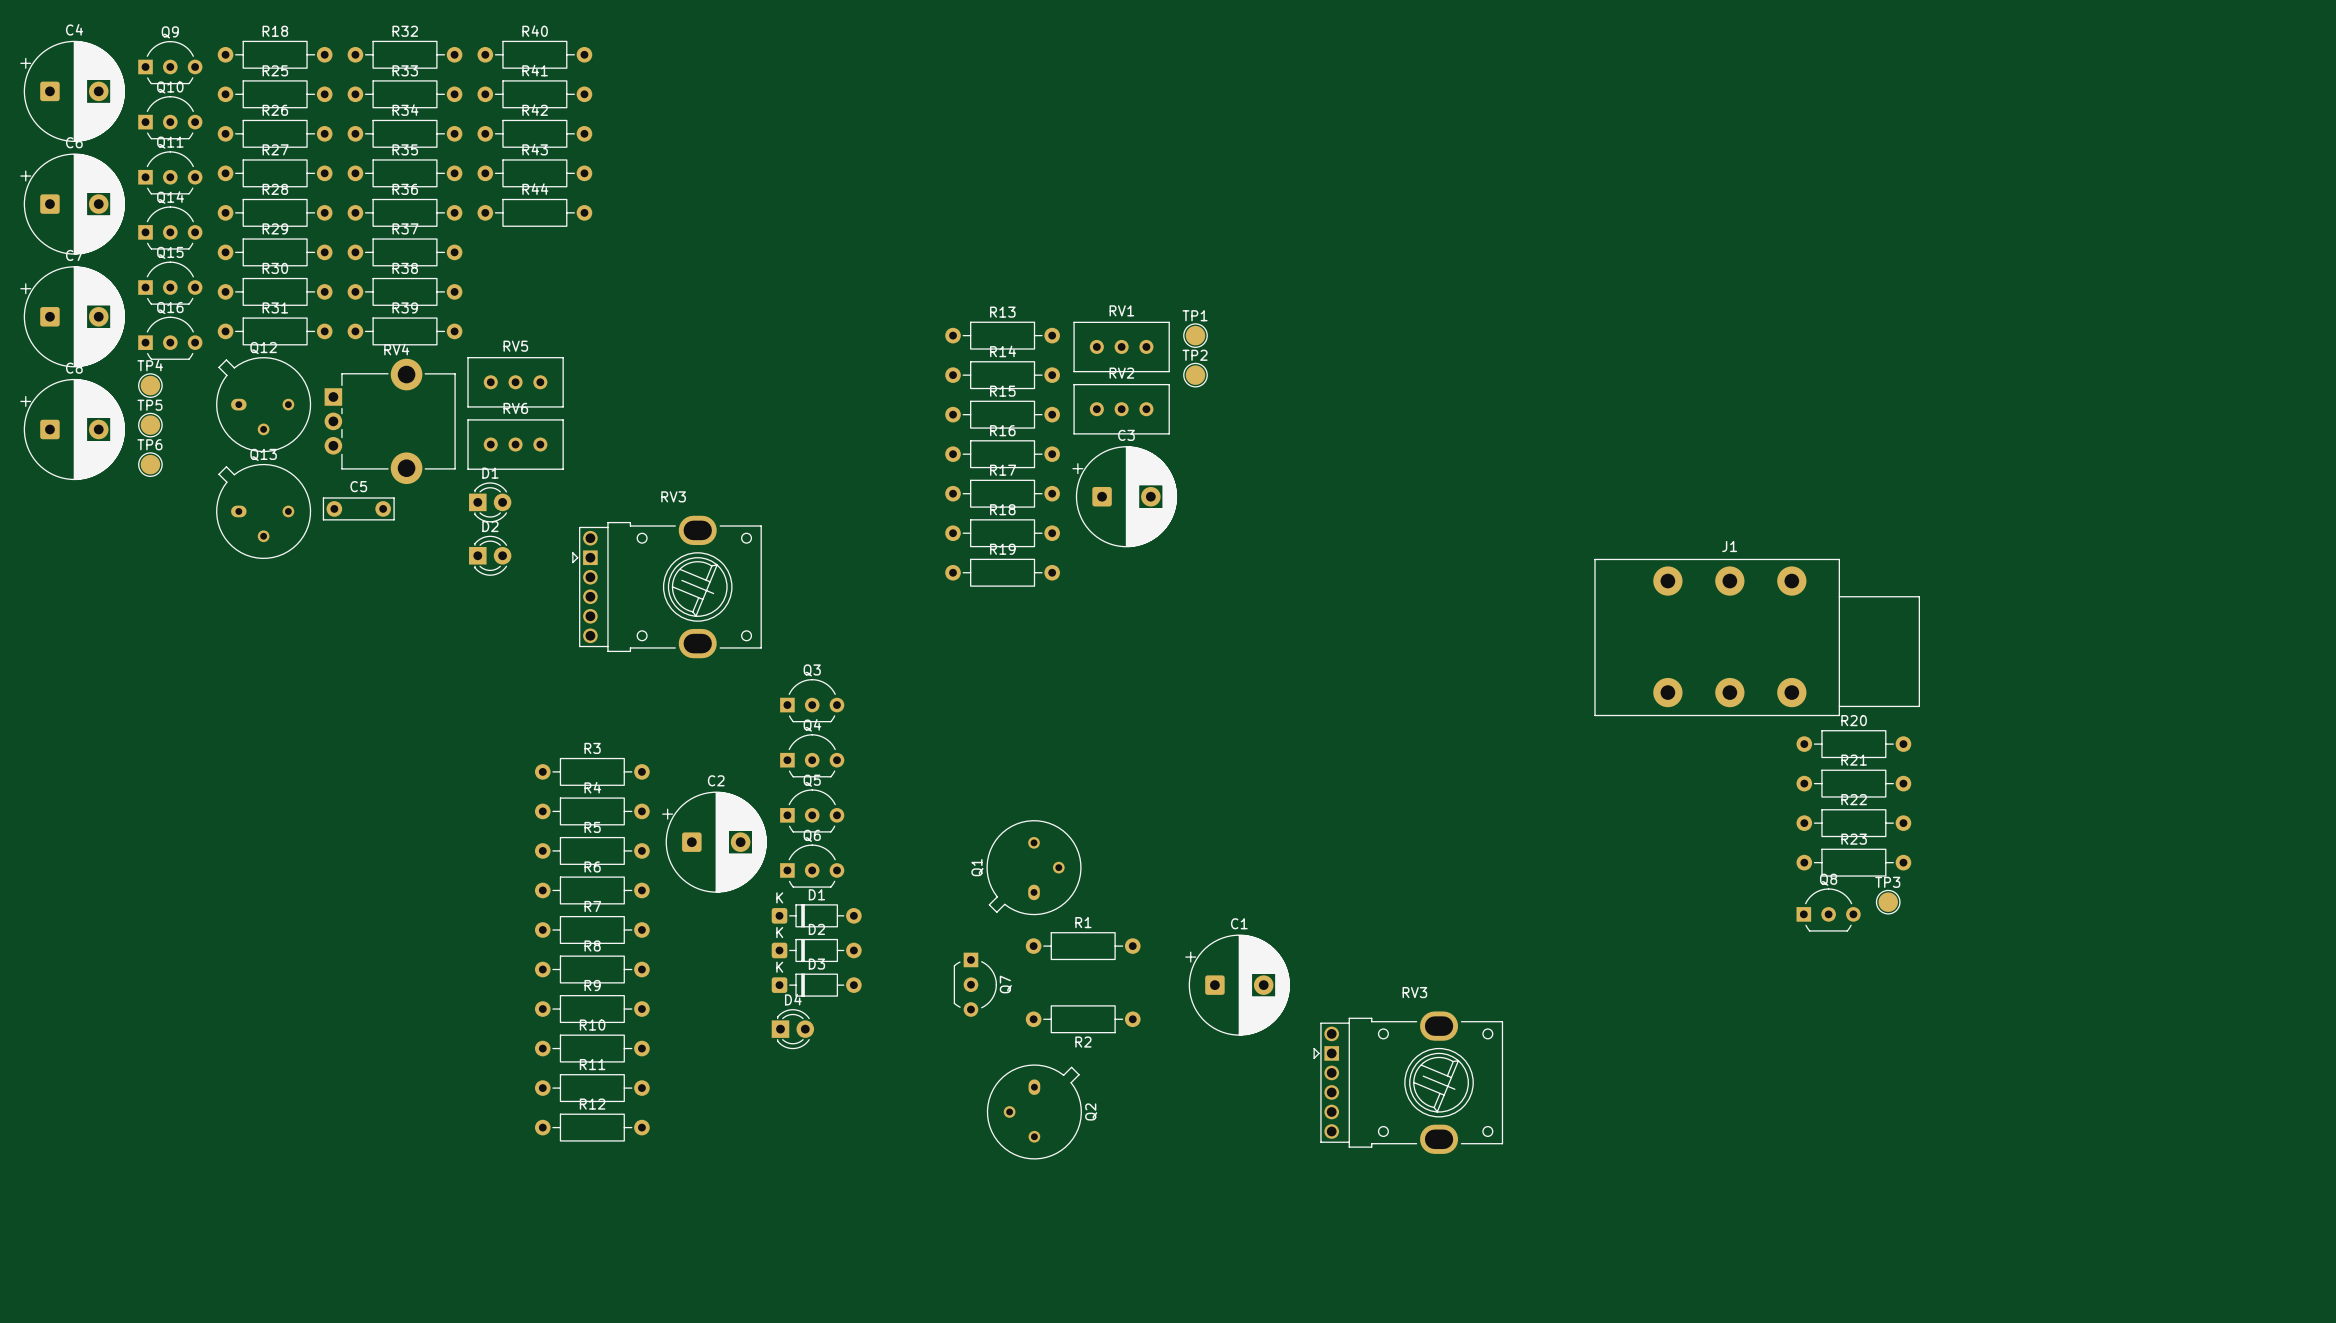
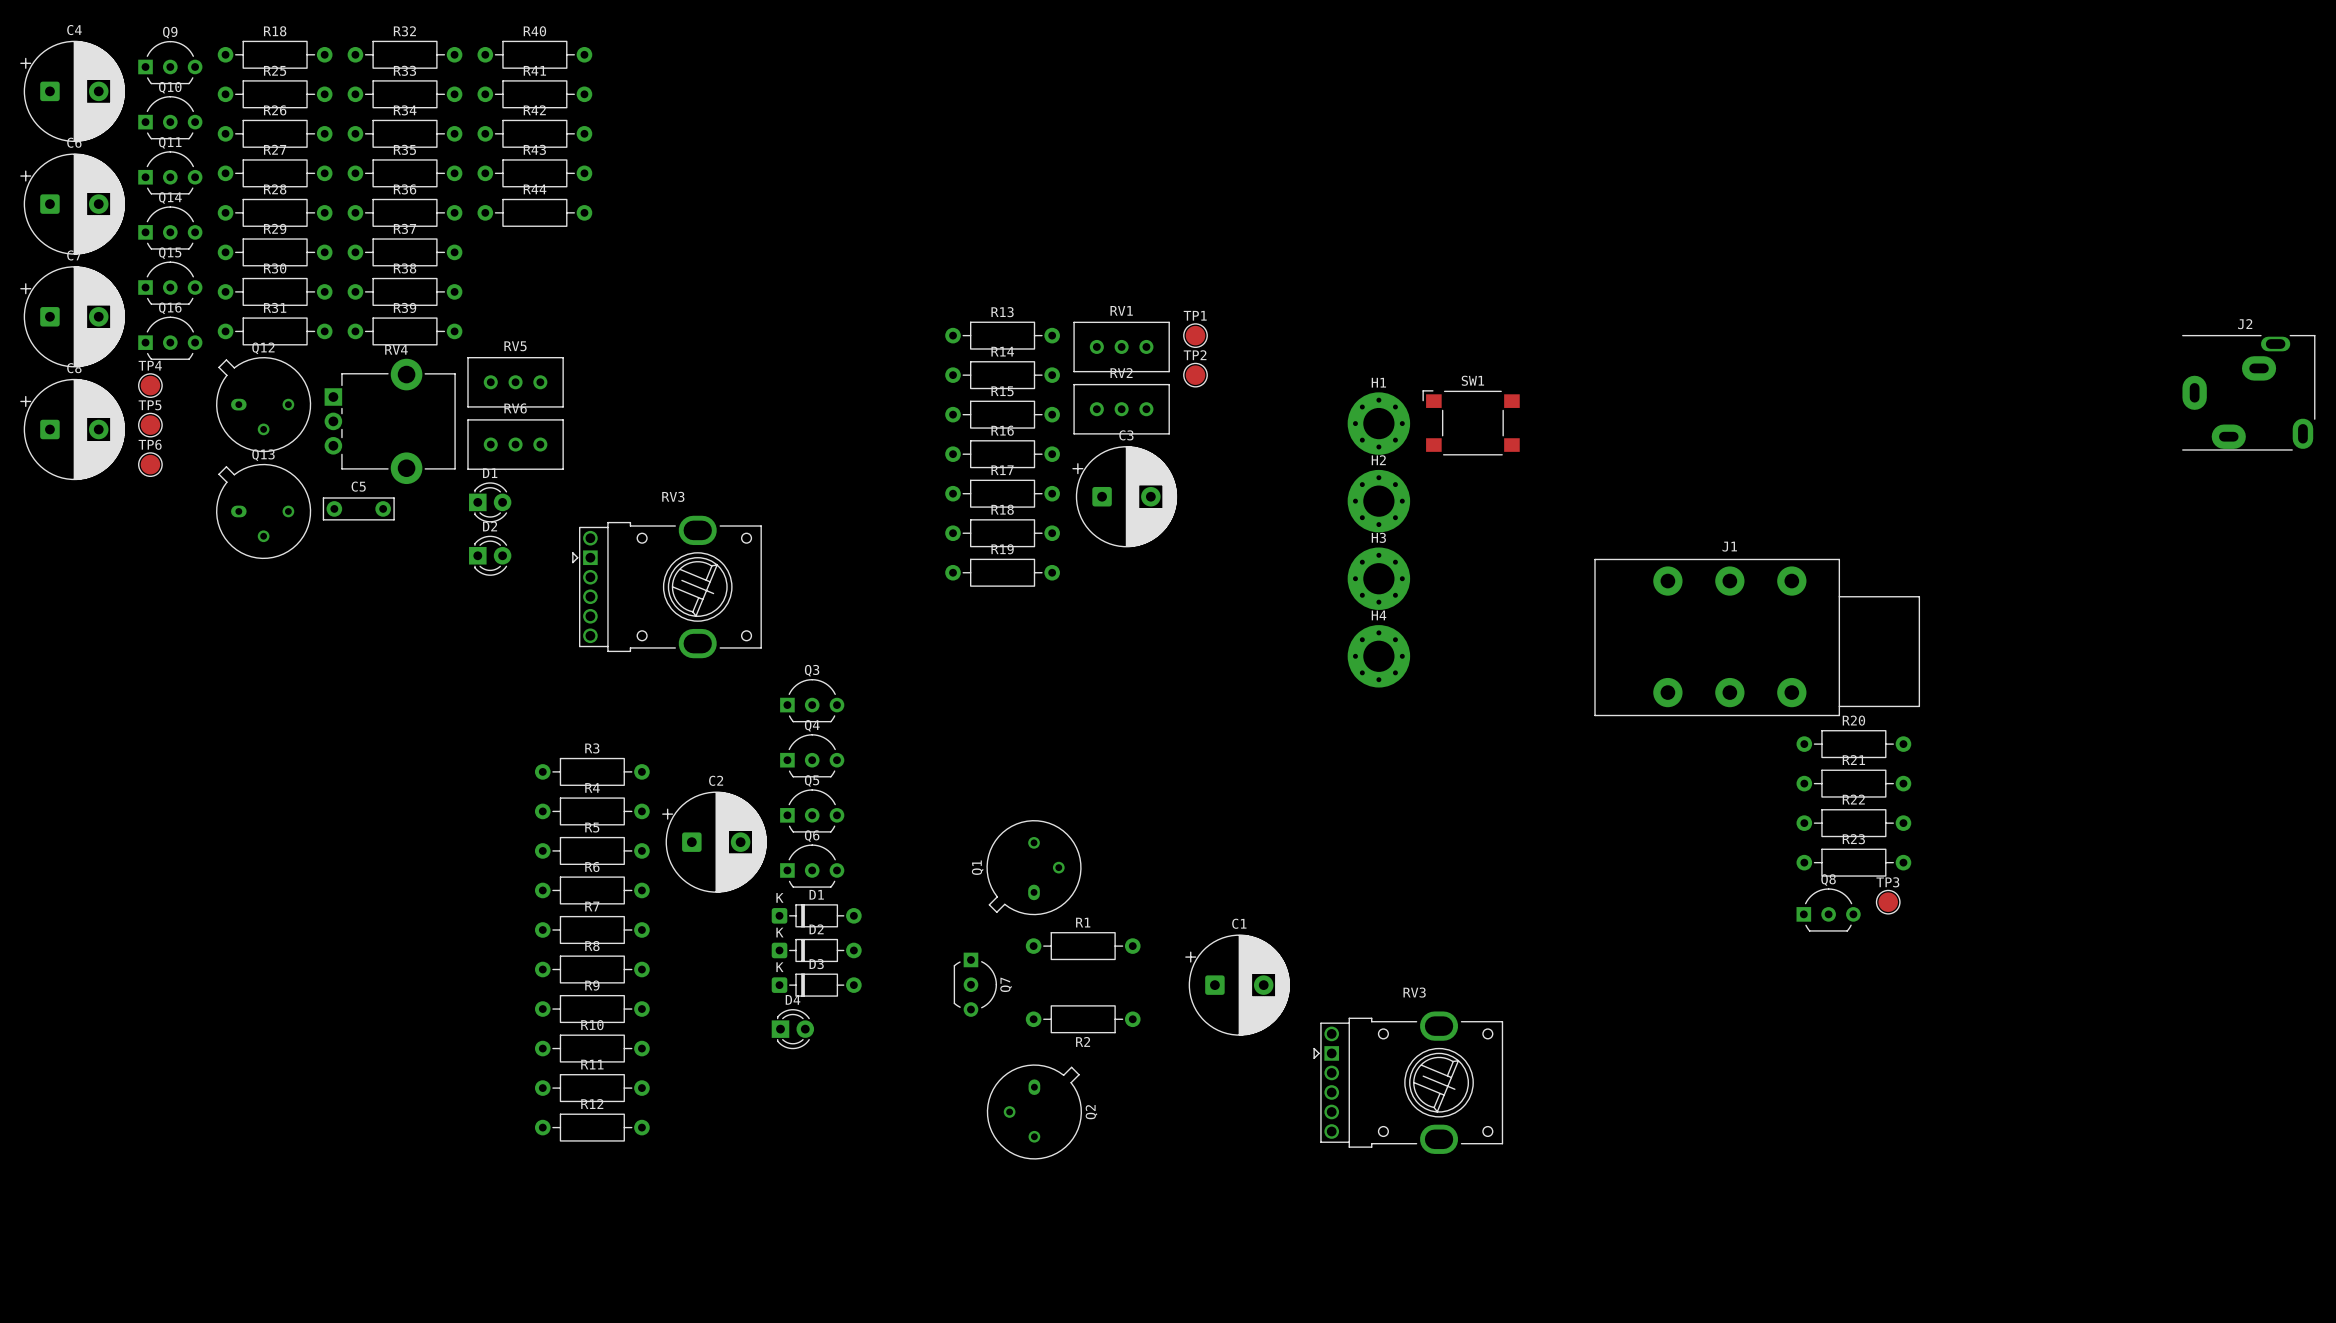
J2: none -> (2248, 392)
SW1: none -> (1471, 422)
H1: none -> (1378, 423)
H2: none -> (1378, 501)
H3: none -> (1378, 578)
H4: none -> (1378, 656)

